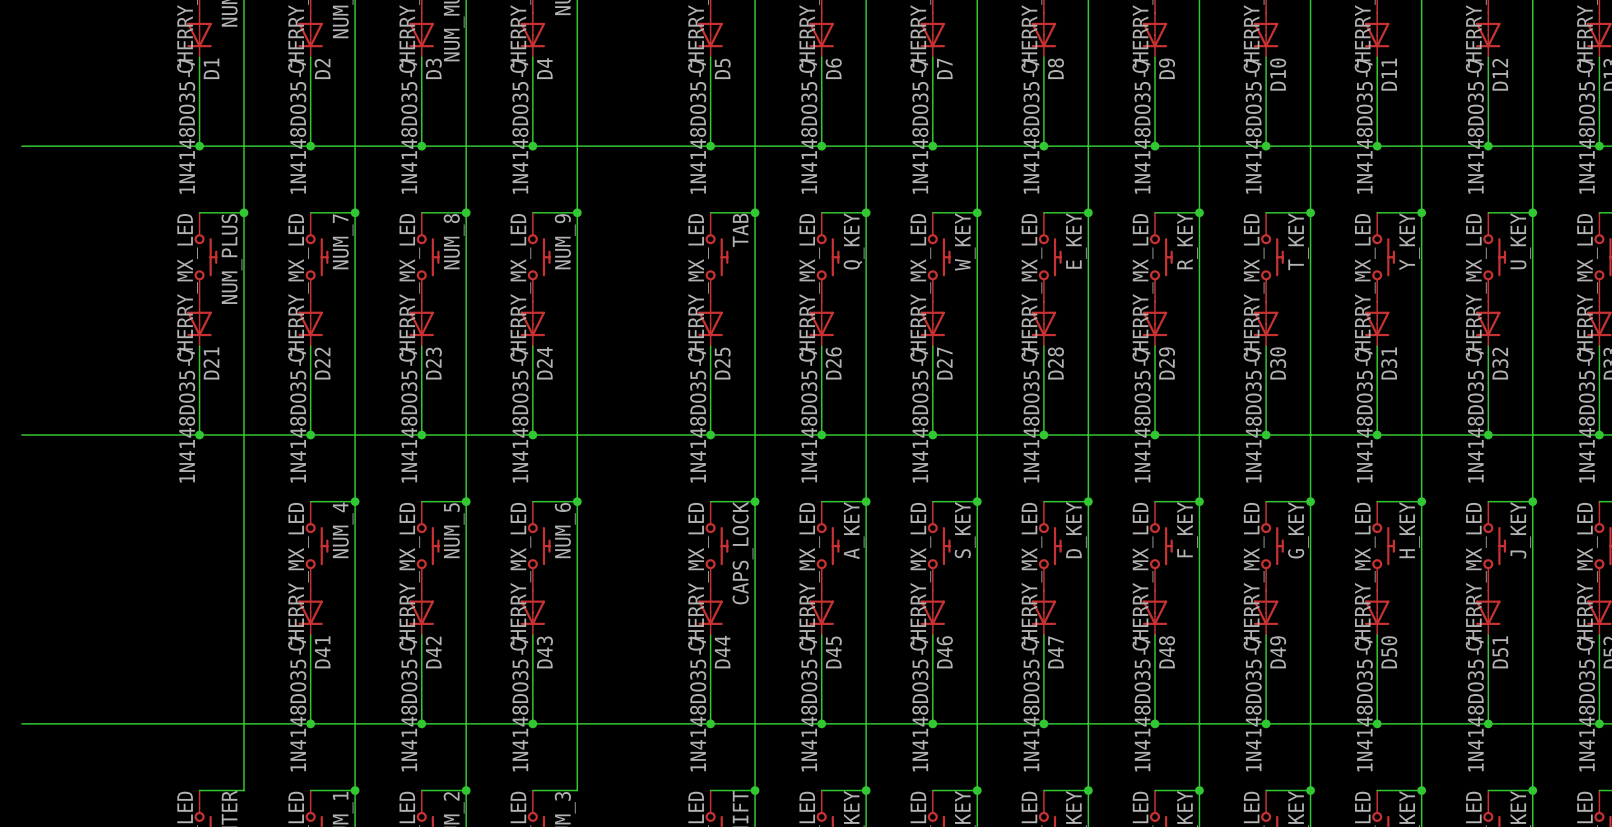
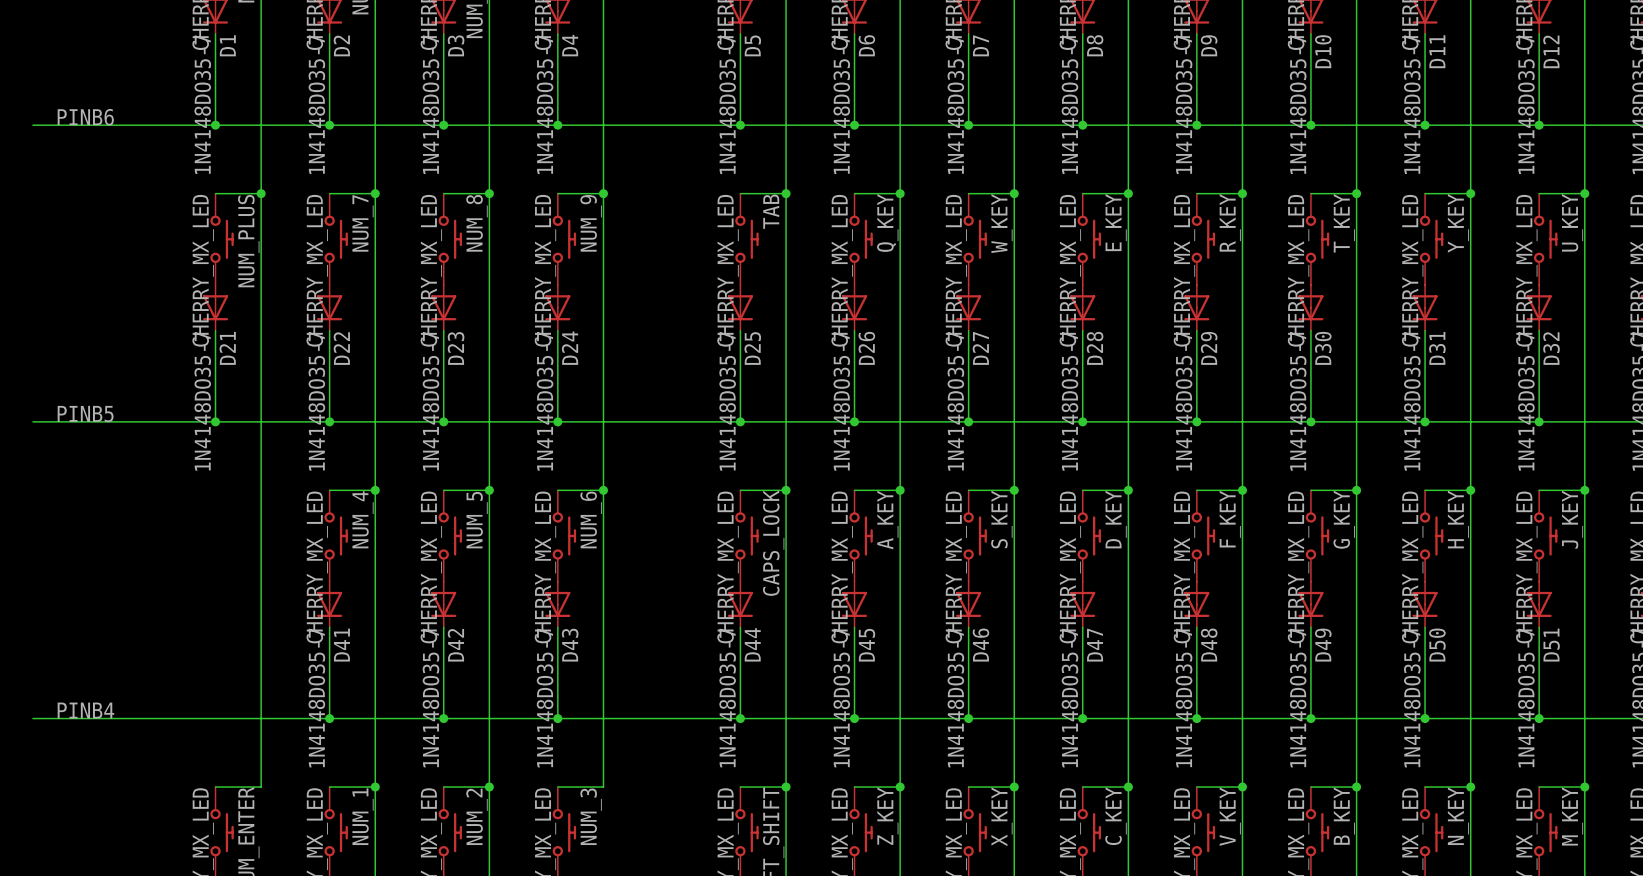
label: none -> PINB6 (85, 117)
label: none -> PINB5 (85, 414)
label: none -> PINB4 (85, 710)

